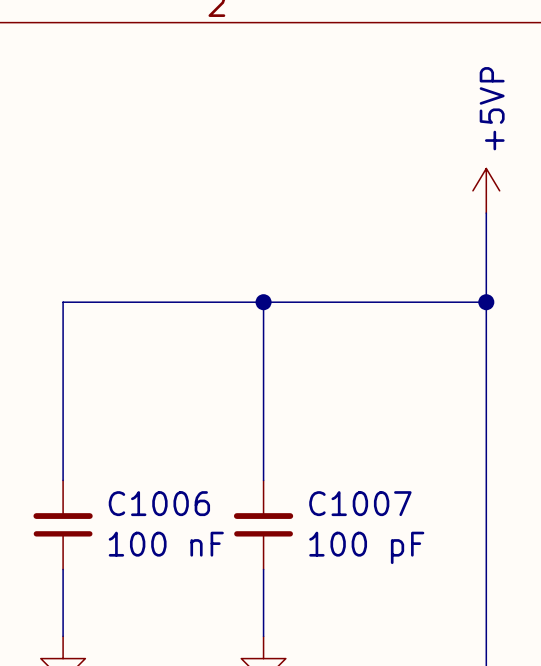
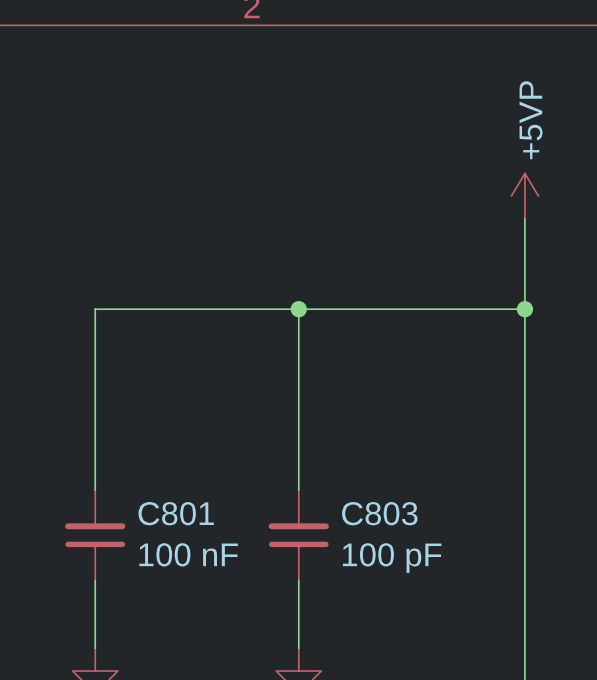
C1006 name: C1006 (159, 503) -> C801 (176, 513)
C1007 name: C1007 (360, 503) -> C803 (379, 513)

